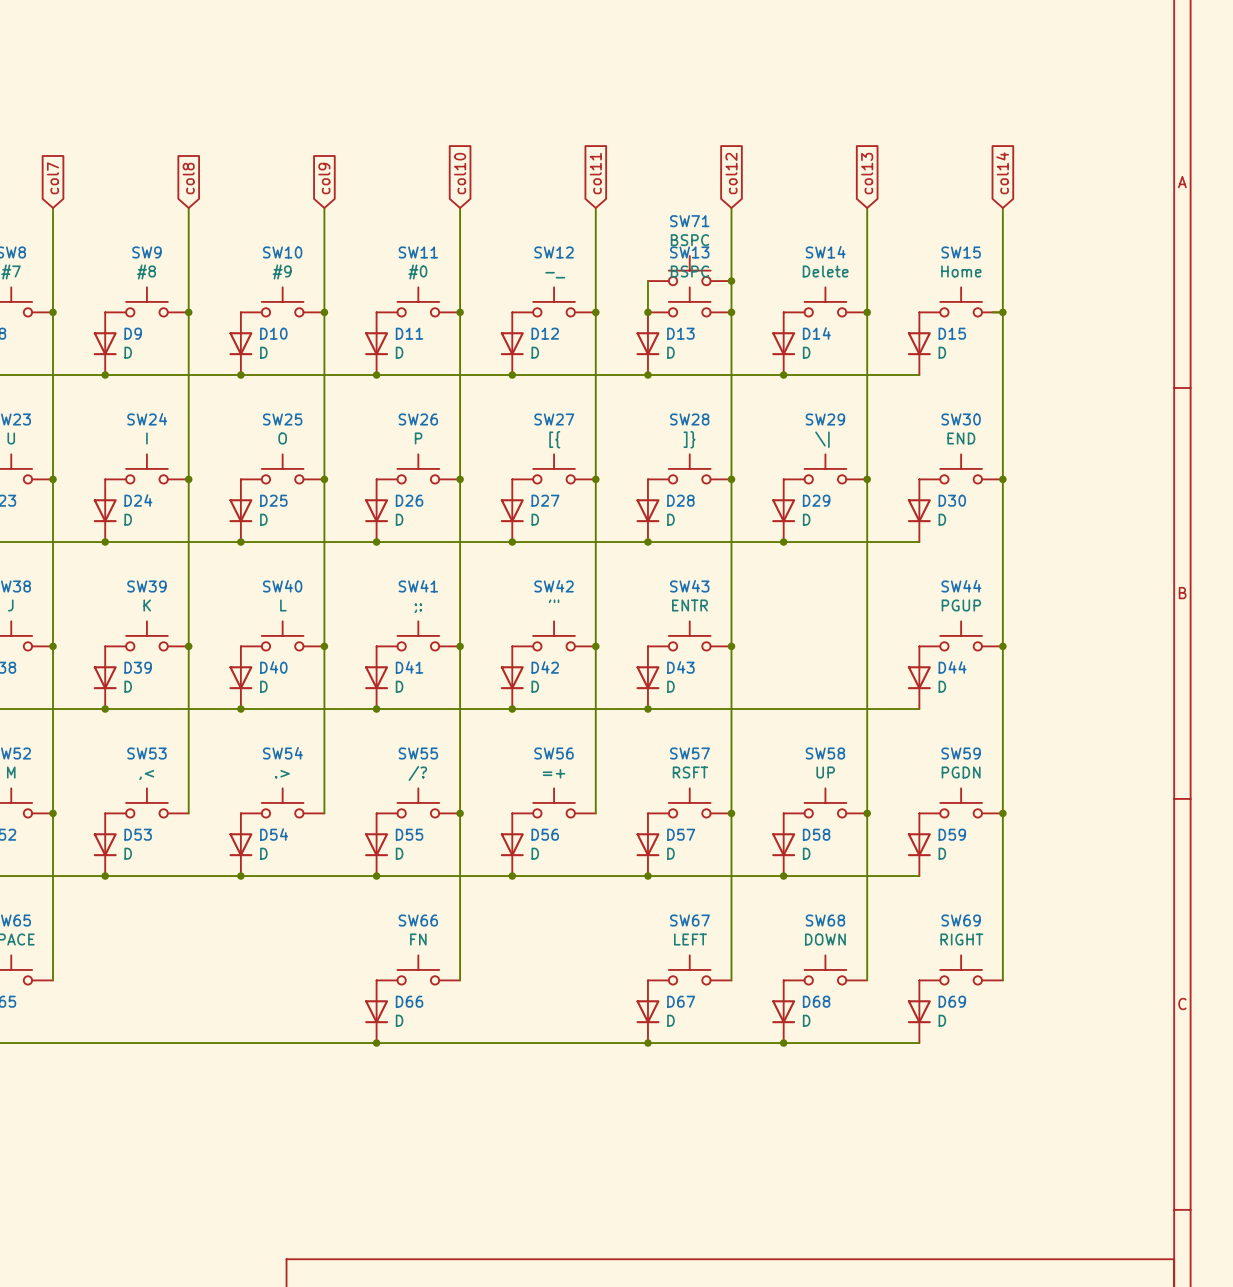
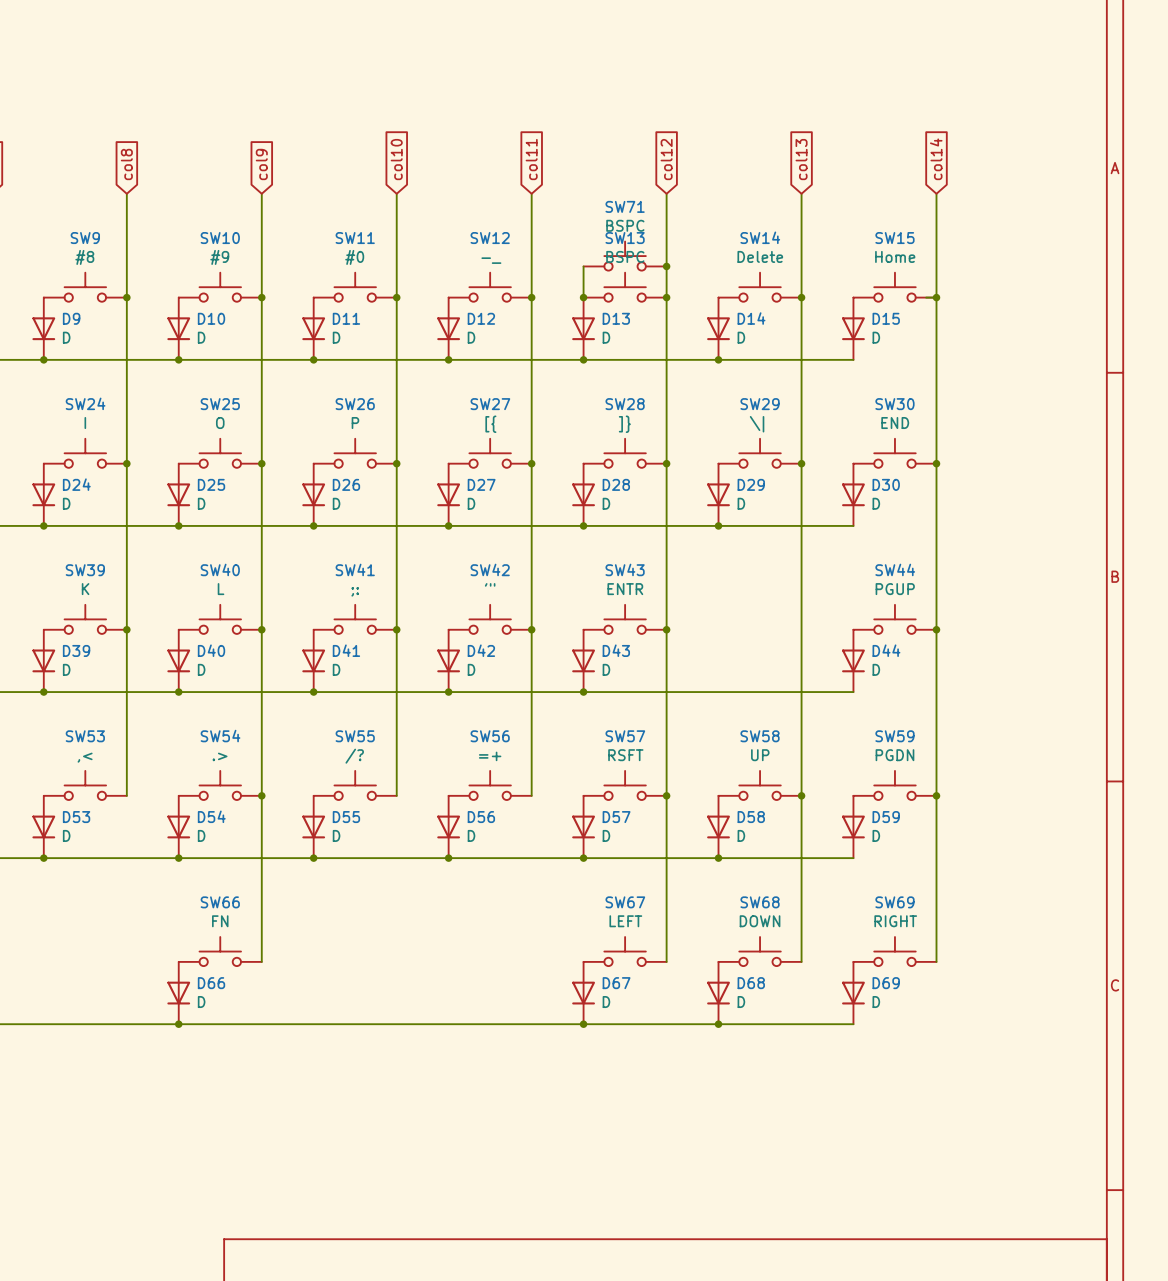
junction: none -> (261, 795)
wire: (460, 813) (460, 980) -> (261, 795) (261, 961)
junction: (460, 813) -> none
SW66 position: (418, 969) -> (220, 951)
D66 position: (376, 1011) -> (178, 993)
junction: none -> (178, 1024)
junction: (376, 1043) -> none

